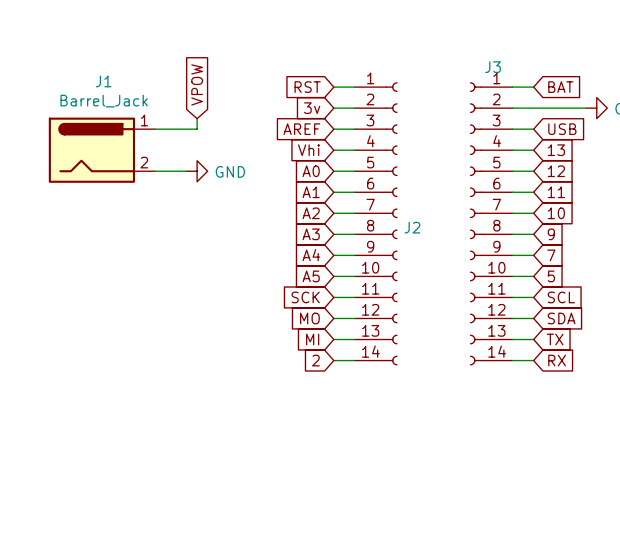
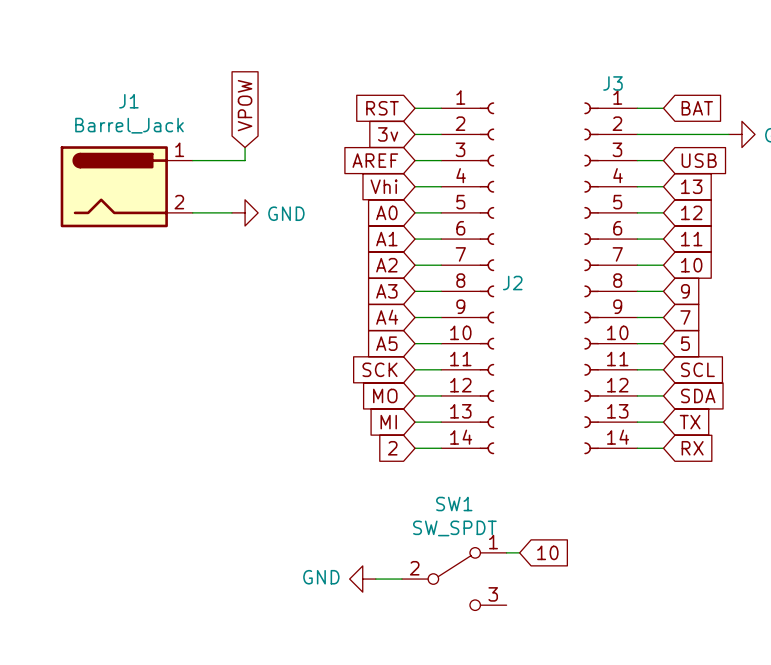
wire: none -> (506, 552) (519, 552)
global label: none -> 10 (547, 552)
power symbol: none -> GND (362, 579)
wire: none -> (375, 579) (401, 579)
SW1: none -> SW_SPDT (454, 579)

